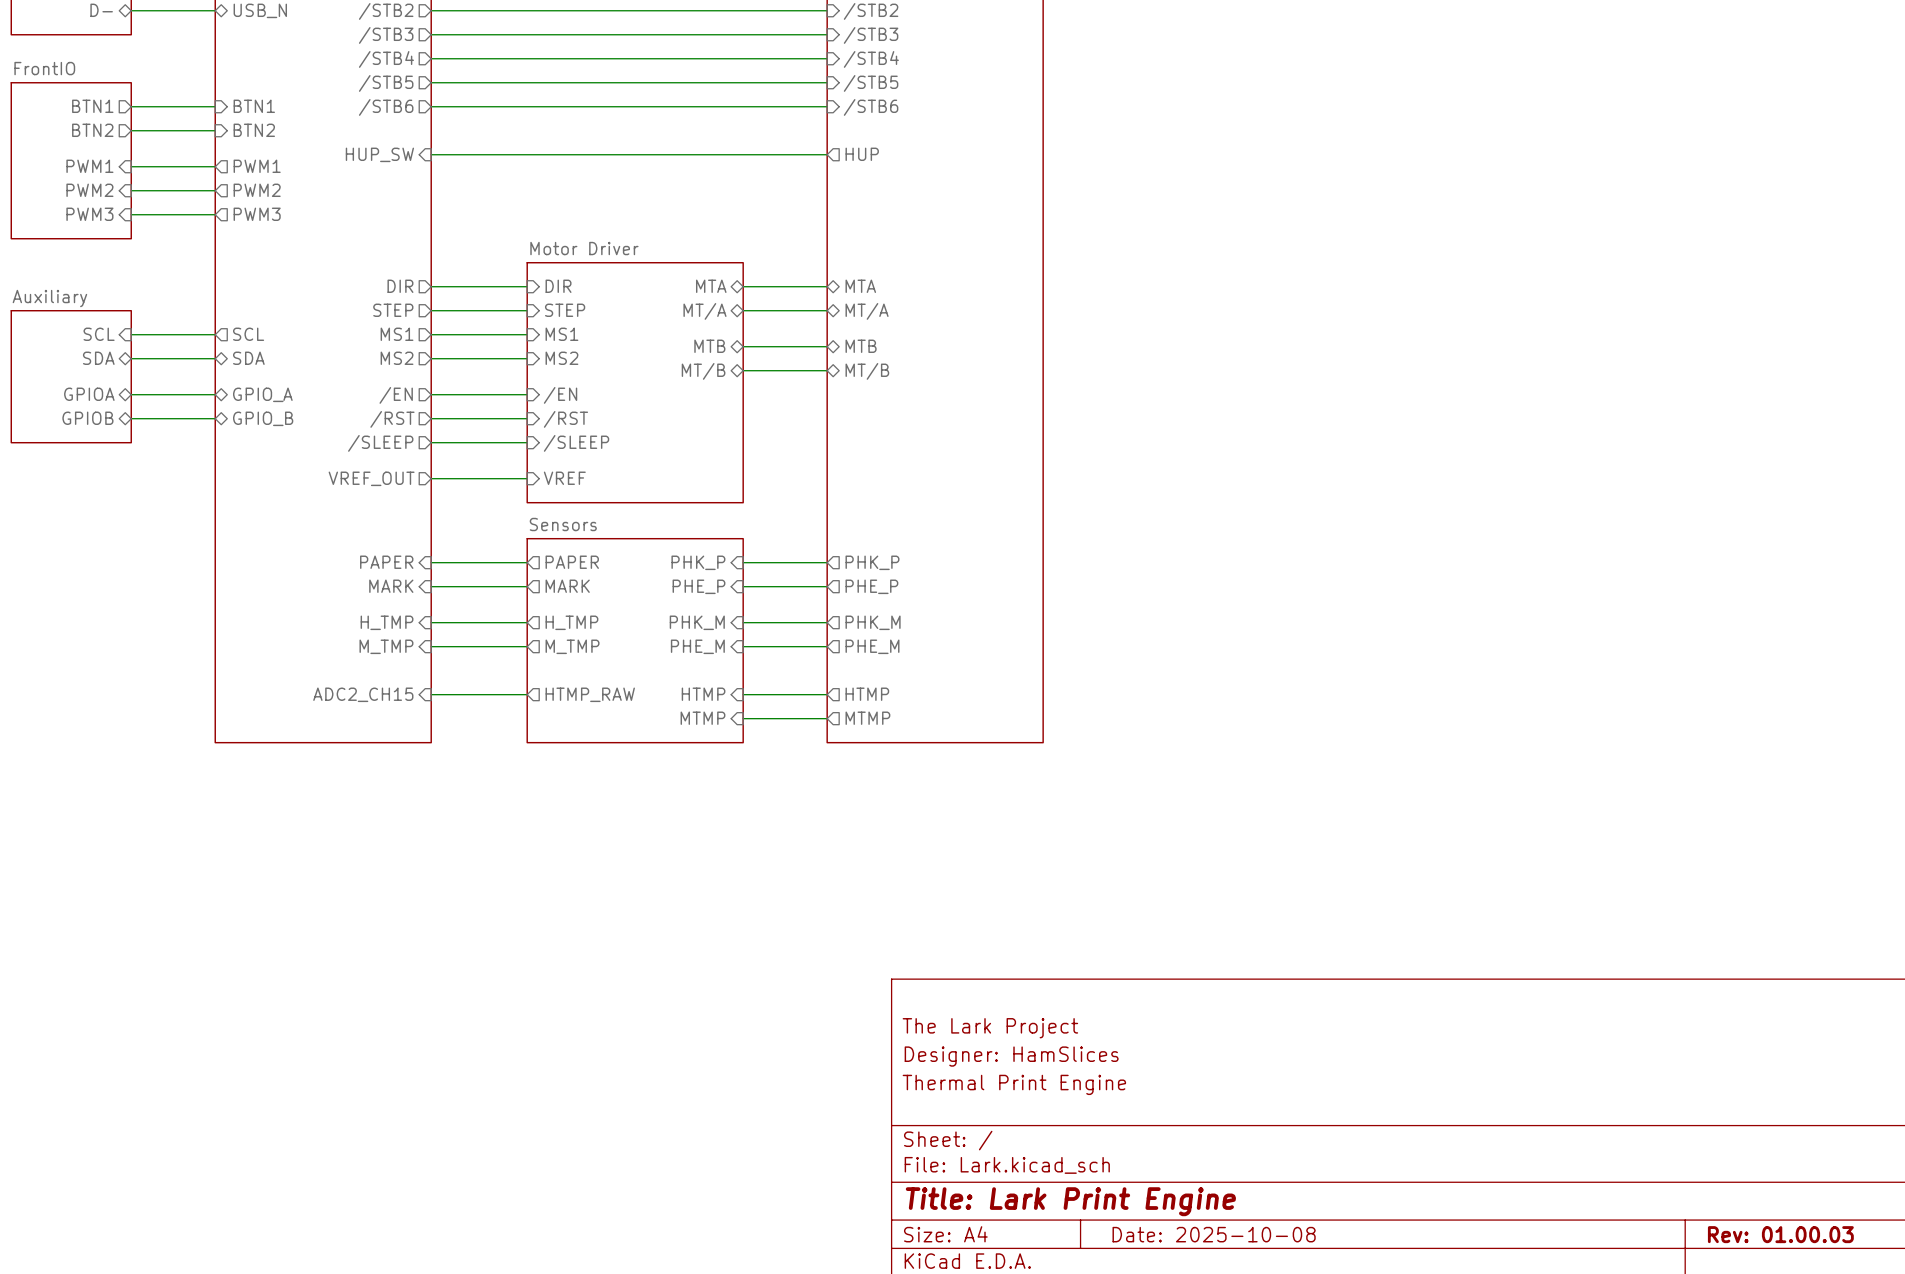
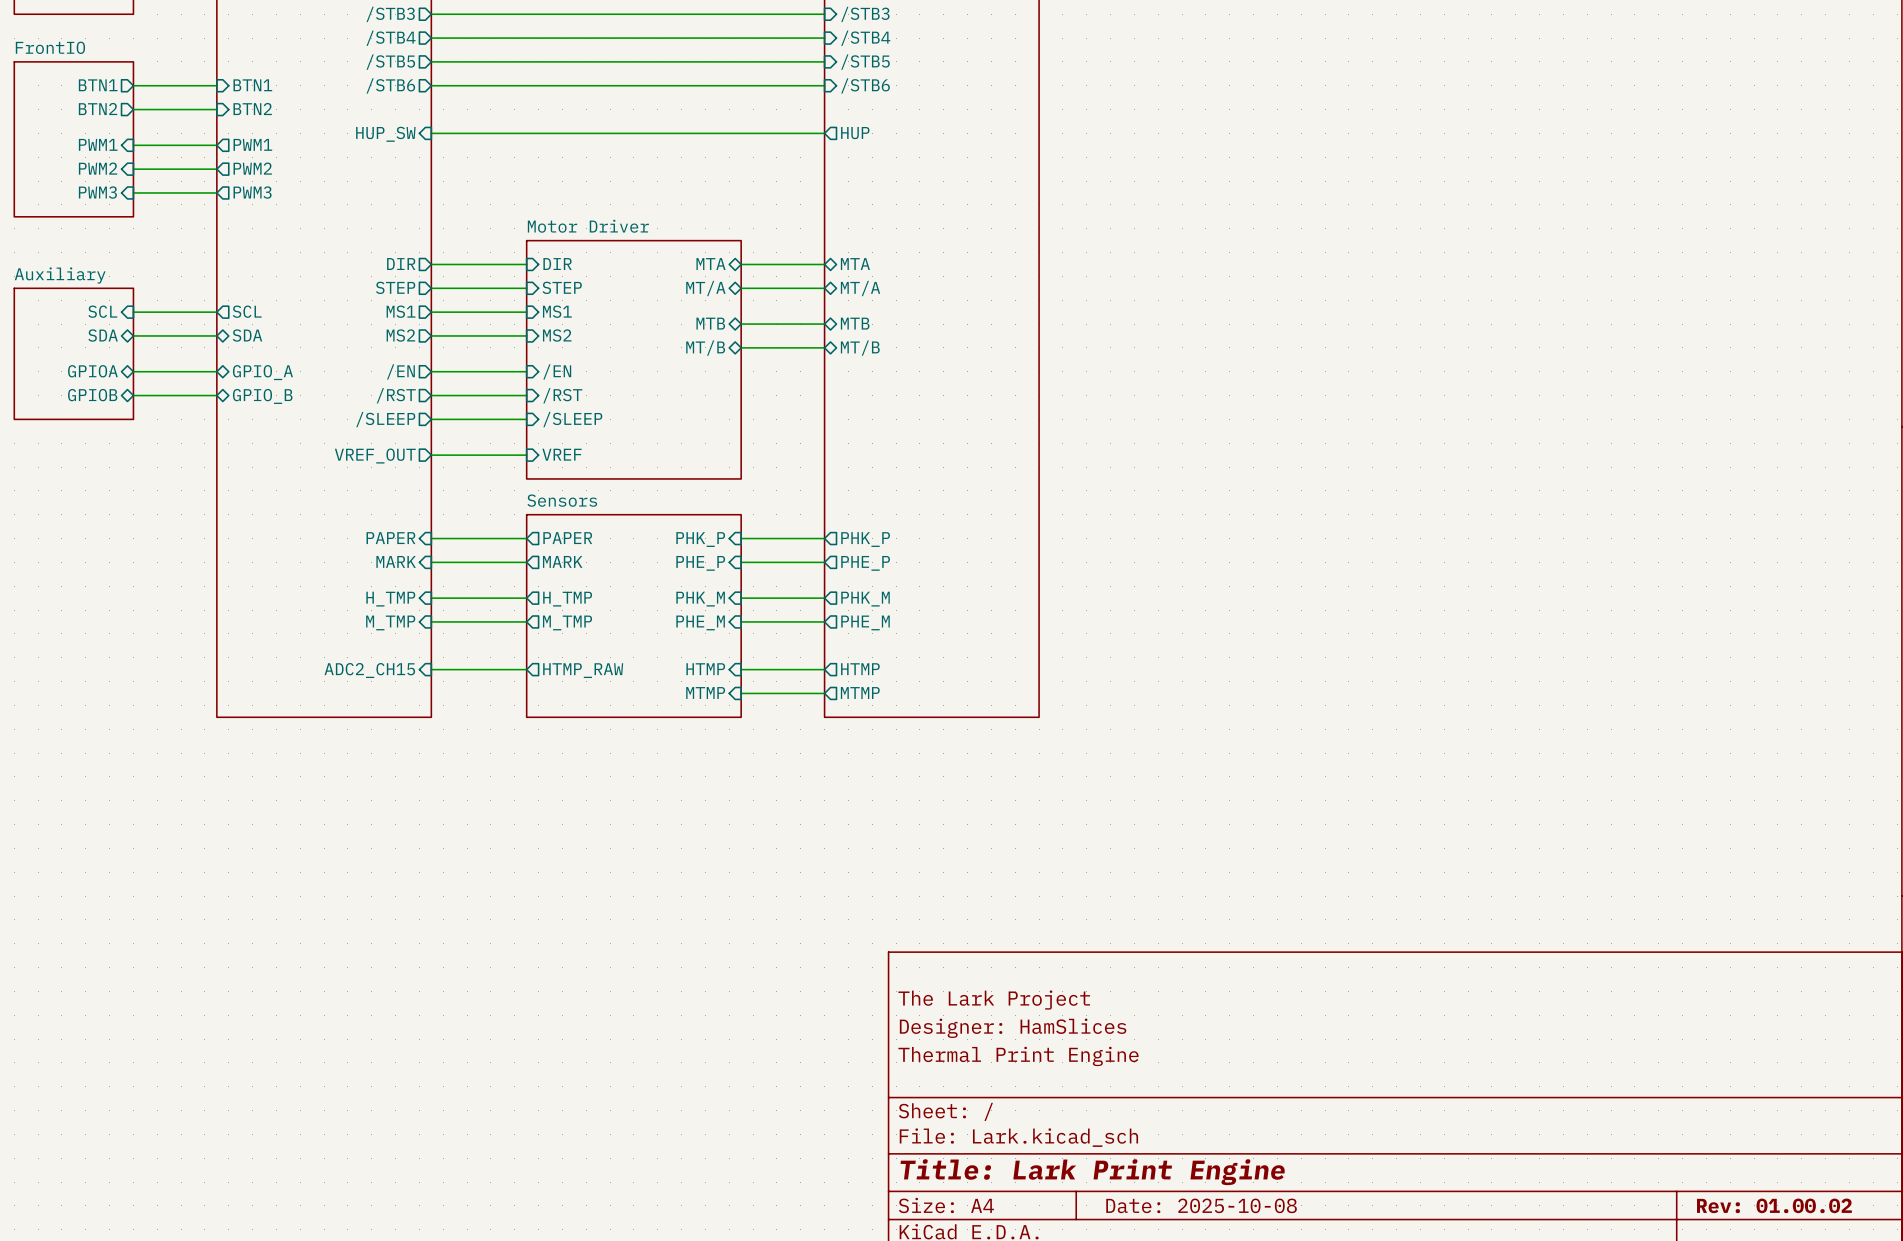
title block: Rev: 01.00.03 (1780, 1234) -> Rev: 01.00.02 (1774, 1205)

